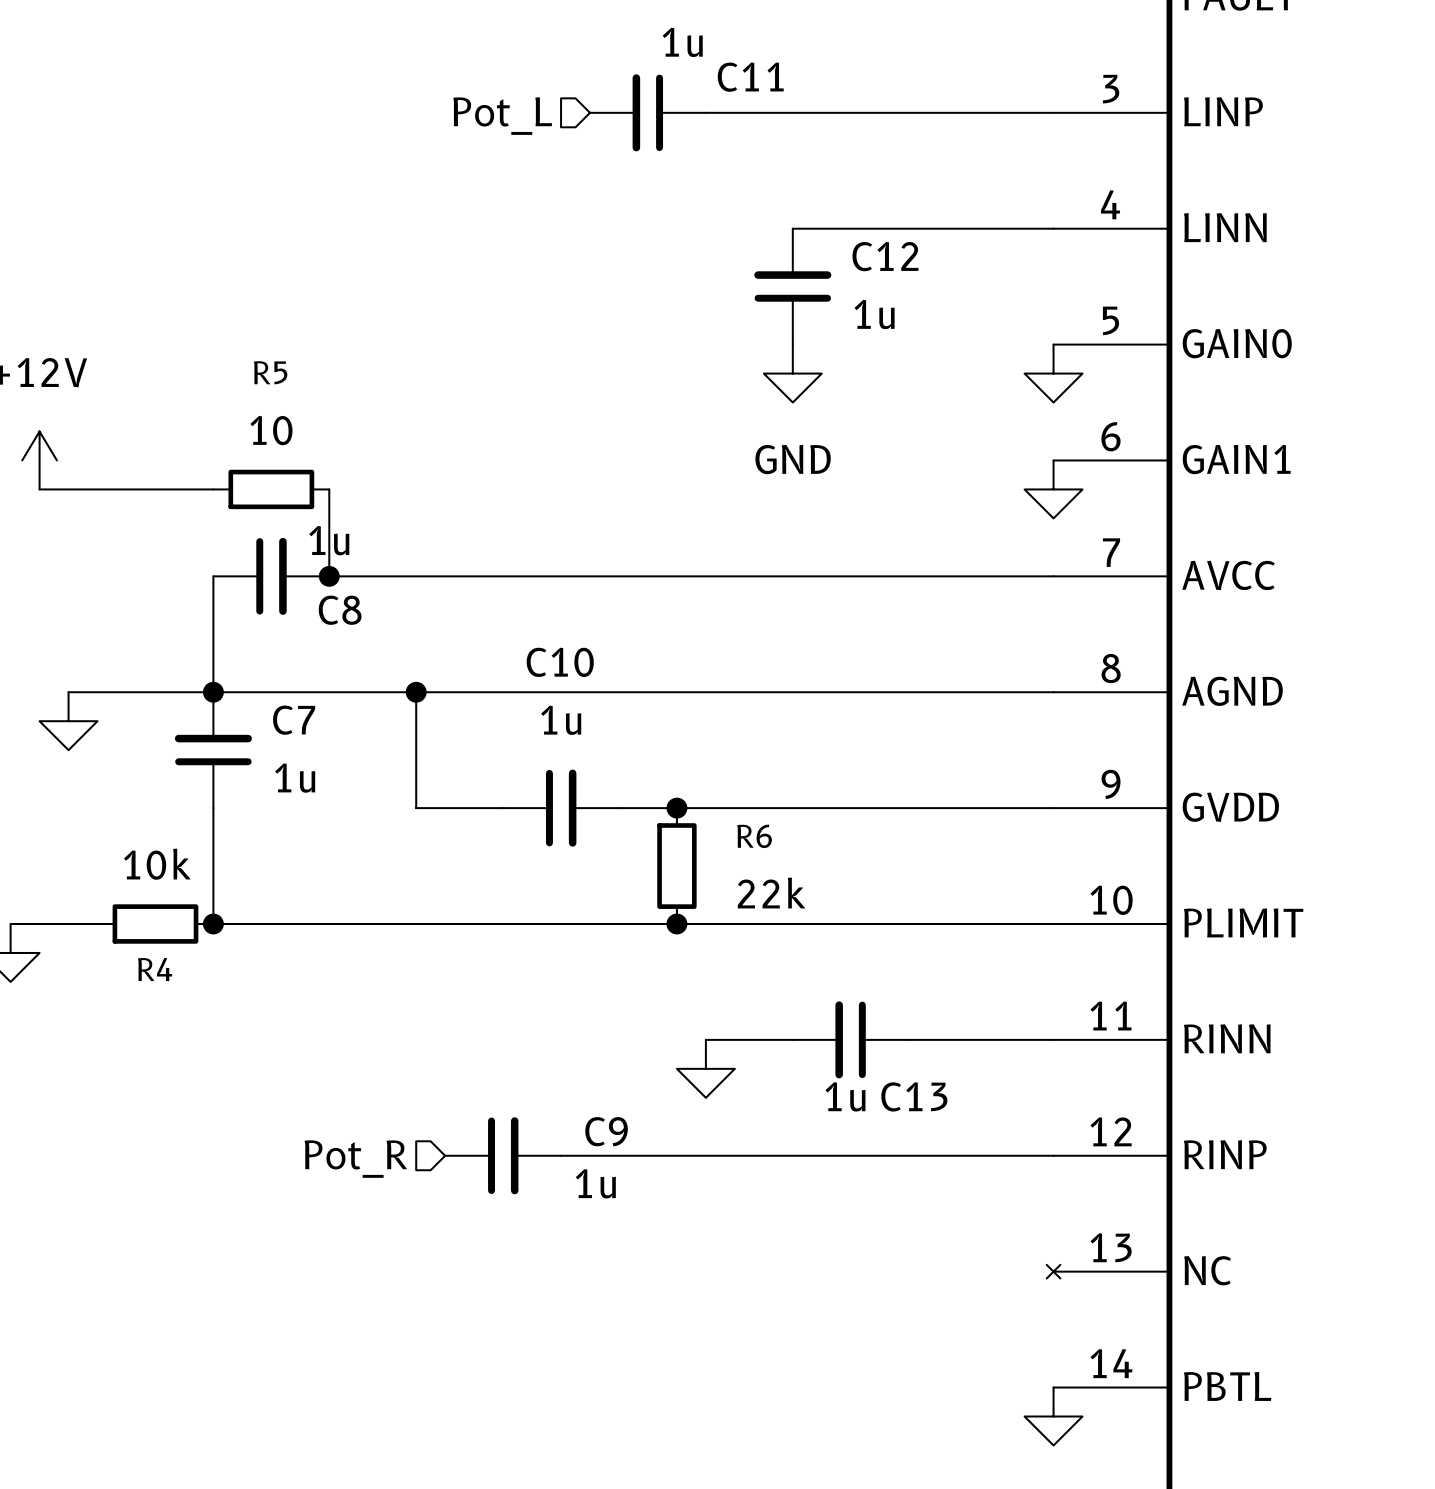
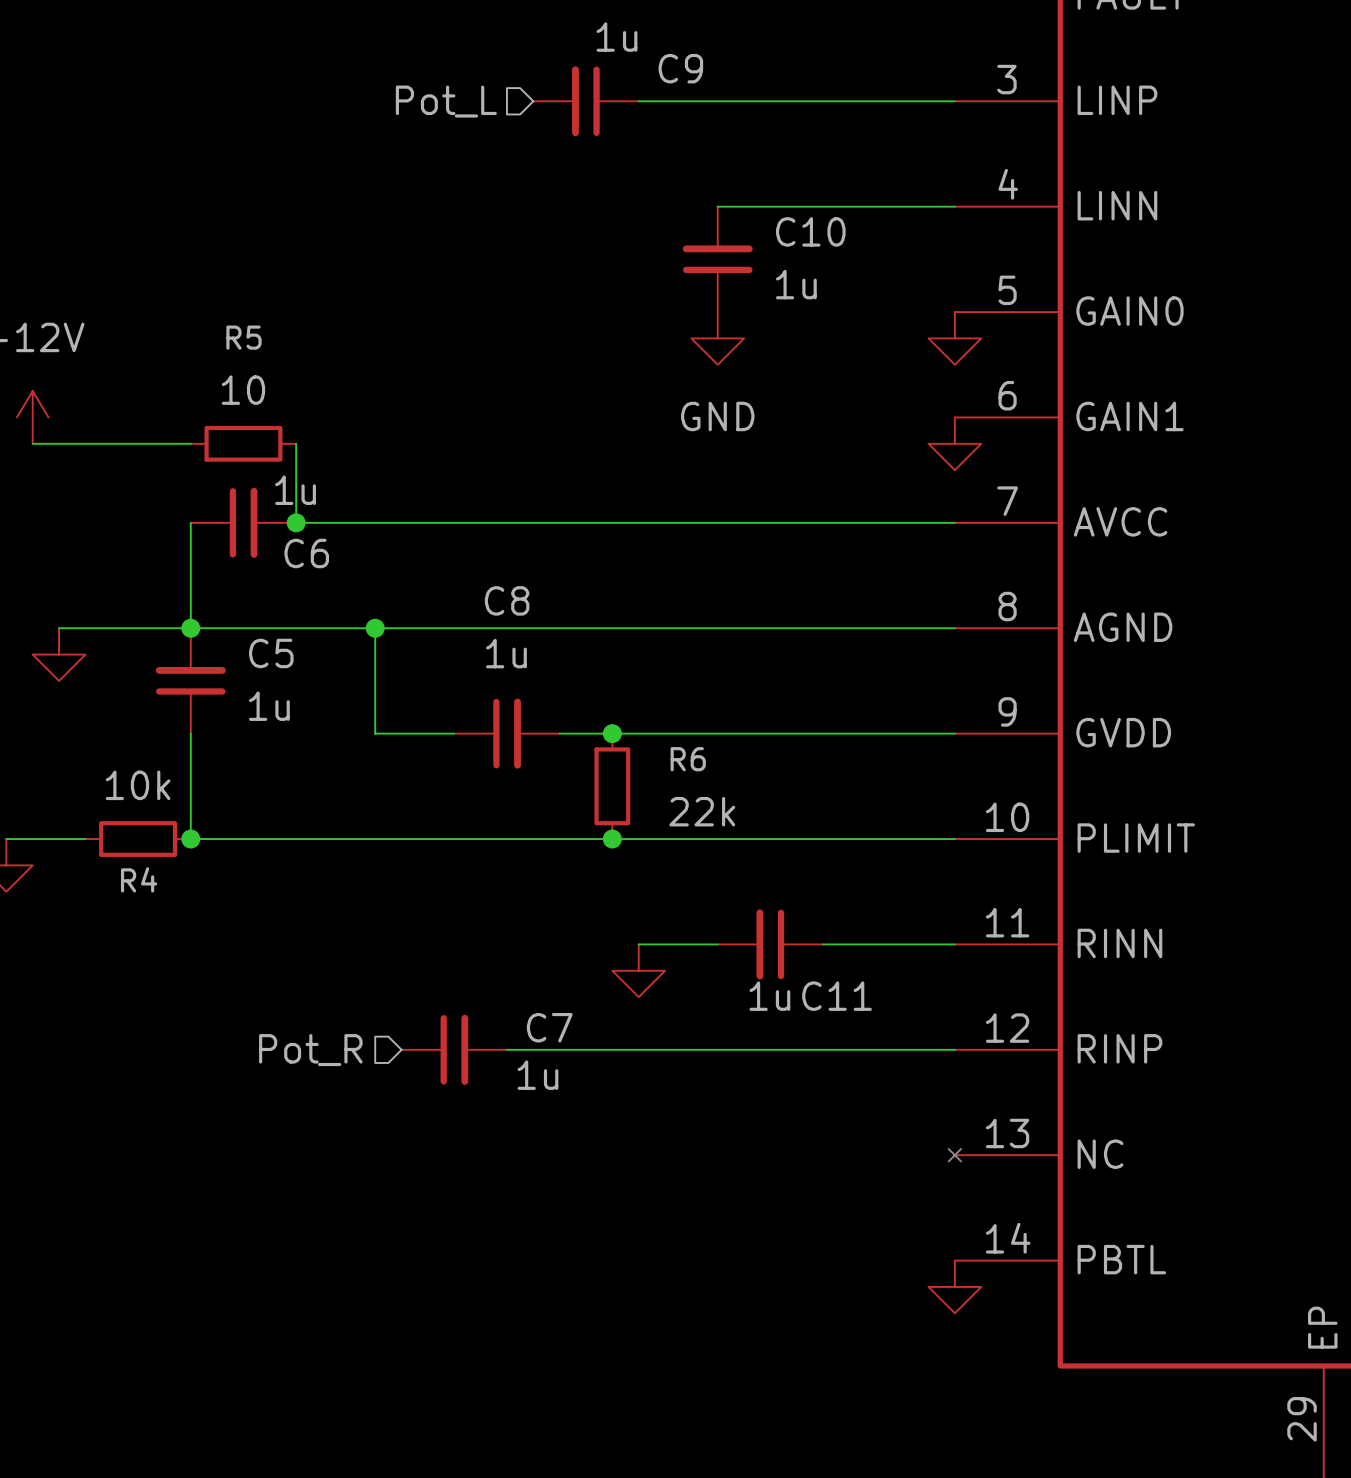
C11 name: C11 (750, 77) -> C9 (680, 68)
C12 name: C12 (885, 256) -> C10 (810, 231)
C8 name: C8 (340, 610) -> C6 (306, 553)
C10 name: C10 (560, 662) -> C8 (507, 600)
C7 name: C7 (294, 720) -> C5 (271, 653)
C13 name: C13 (914, 1096) -> C11 (837, 996)
C9 name: C9 (606, 1131) -> C7 (549, 1027)

